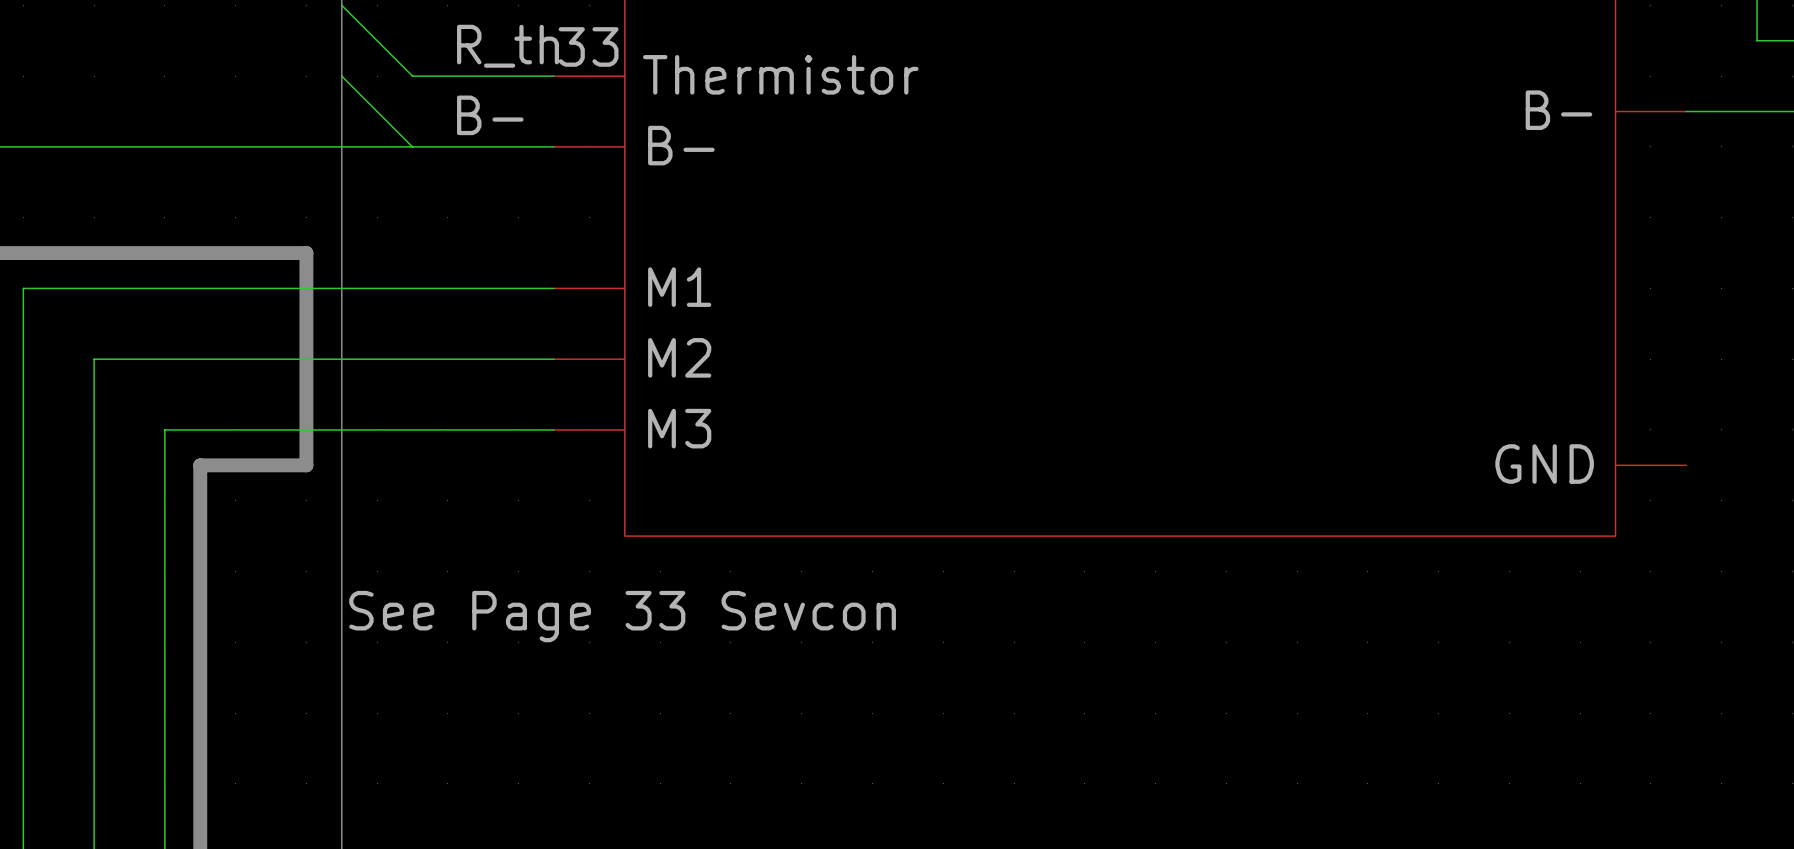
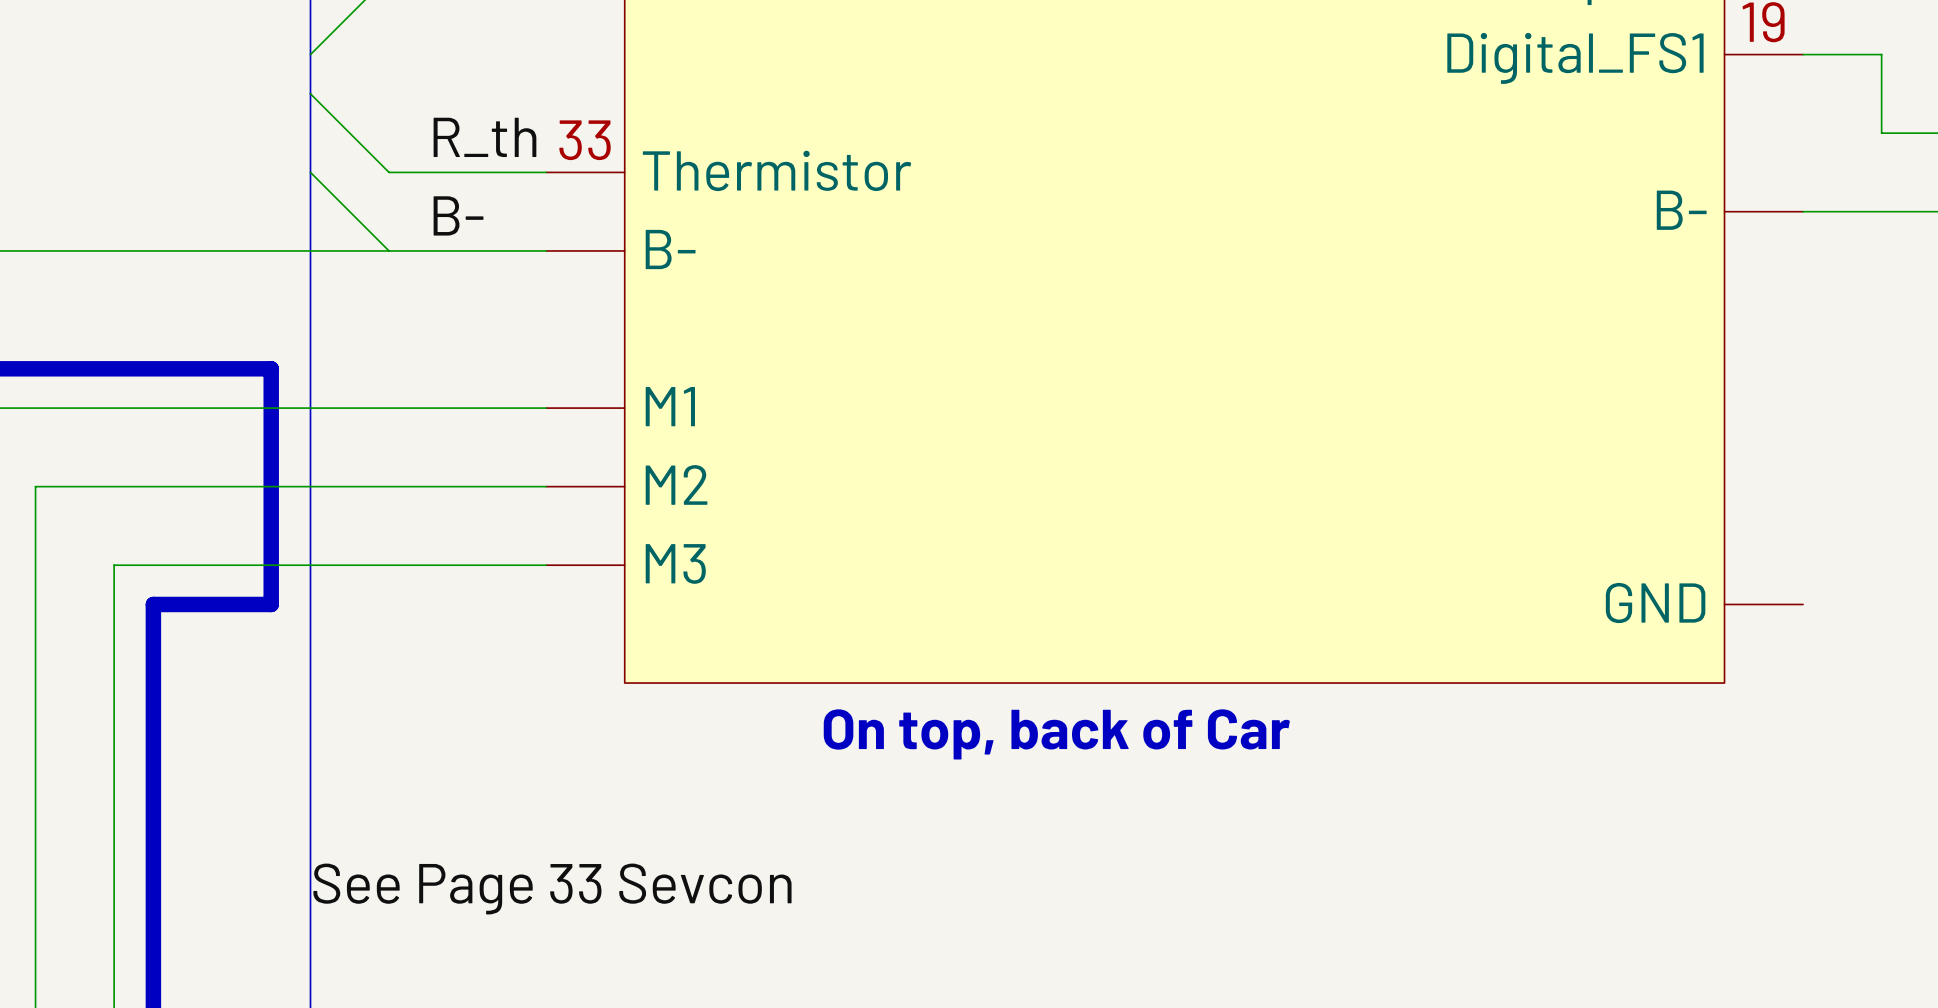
text: none -> On top, back of Car (1056, 734)
label position: See Page 33 Sevcon (622, 616) -> See Page 33 Sevcon (552, 889)

